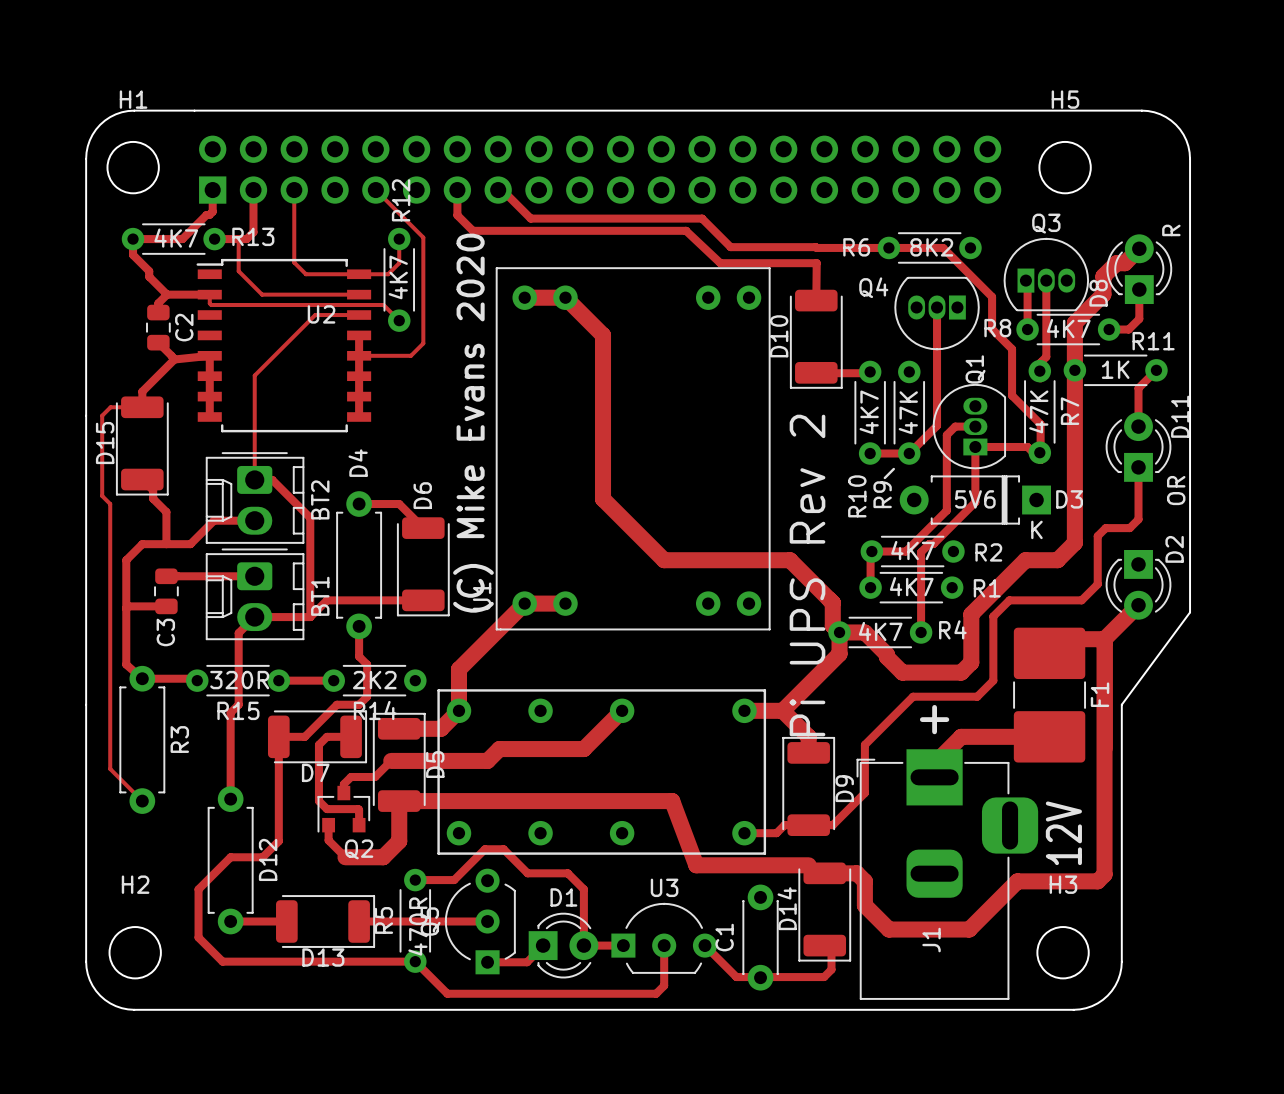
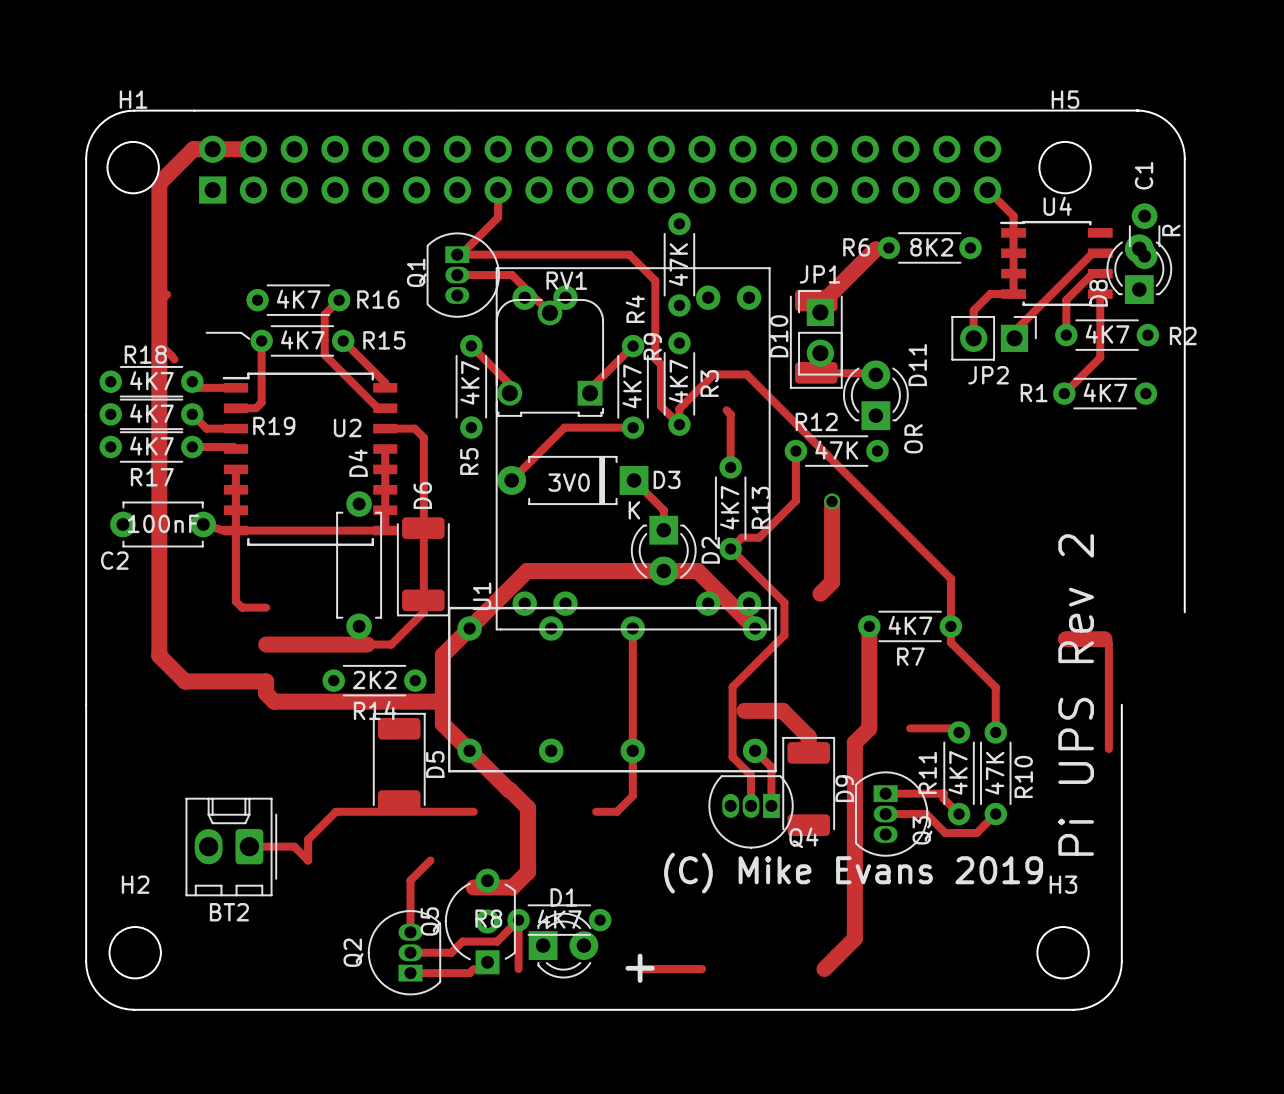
board edge: (194, 110) (1141, 110) (1154, 112) (1165, 117) (1175, 124) (1183, 134) (1188, 146) (1190, 158) (1190, 612) (1121, 704) -> (194, 110) (1138, 110)
board edge: none -> (1136, 110) (1155, 114) (1170, 124) (1181, 140) (1184, 158)
track: none -> (253, 149) (193, 149) (159, 183) (159, 655) (185, 681) (266, 681) (266, 693) (274, 701) (442, 701)
board edge: none -> (1184, 158) (1184, 612)
track: (498, 185) (530, 218) (702, 218) (730, 247) (943, 247) (992, 296) (992, 329) (1012, 349) (1012, 395) (1040, 424) (1040, 460) (1027, 446) (975, 446) (975, 502) (933, 543) (929, 543) (921, 552) (921, 632) -> none
track: (212, 190) (212, 211) (206, 215) (182, 239) (133, 239) (133, 254) (149, 271) (149, 276) (167, 294) (209, 294) (211, 305) (383, 305) (399, 320) -> none
track: (253, 190) (253, 232) (246, 239) (214, 239) -> none
track: (294, 190) (294, 262) (305, 274) (388, 274) (399, 263) (399, 239) -> none
track: (375, 190) (423, 237) (423, 343) (410, 355) (359, 355) -> none
track: (457, 190) (457, 215) (472, 230) (686, 230) (720, 263) (816, 263) (816, 300) -> none
track: none -> (498, 190) (498, 217) (460, 254)
track: none -> (987, 190) (1013, 216) (1013, 294) (990, 294) (973, 310) (973, 338)
R12 name position: R12 (401, 200) -> R12 (816, 421)
R13 name position: R13 (253, 236) -> R13 (760, 507)
R13 rotation: 0° (173, 239) -> 90° clockwise (730, 508)
R13 position: (173, 239) -> (730, 508)
track: (238, 239) (238, 271) (262, 294) (359, 294) -> none
track: (1139, 248) (1124, 263) (1116, 263) (1103, 276) (1103, 294) (1074, 323) (1074, 542) (1057, 560) (1025, 560) (971, 614) (971, 662) (961, 672) (902, 672) (864, 632) (839, 632) -> none
track: none -> (875, 249) (820, 304) (820, 312)
track: none -> (1100, 253) (1092, 253) (1014, 331) (1014, 338)
track: none -> (457, 254) (629, 254) (655, 280) (655, 358) (660, 364) (660, 406) (679, 424) (679, 408) (713, 374) (746, 374) (950, 578) (950, 642) (995, 687) (995, 732)
U4: none -> (1056, 263)
track: none -> (1100, 273) (1092, 273) (1066, 300) (1066, 335)
Q3 rotation: 0° (1046, 274) -> 90° clockwise (891, 814)
Q3 position: (1046, 274) -> (891, 814)
track: none -> (457, 275) (512, 275) (549, 312)
R12 value: 4K7 (398, 277) -> 47K (836, 450)
R12 rotation: 0° (399, 279) -> 90° clockwise (836, 451)
R12 position: (399, 279) -> (836, 451)
track: (1025, 280) (1027, 282) (1027, 329) -> none
track: (1046, 280) (1046, 356) (1040, 362) (1040, 378) -> none
Q4 name position: Q4 (873, 287) -> Q4 (803, 837)
track: (1139, 289) (1139, 318) (1128, 329) (1109, 329) -> none
track: none -> (1100, 294) (1100, 357) (1064, 393)
track: (524, 297) (565, 297) (603, 335) (603, 499) (664, 560) (790, 560) (832, 602) (832, 625) (839, 632) -> none
R16: none -> 4K7 (298, 300)
track: none -> (339, 300) (324, 314) (324, 354) (378, 408) (385, 408)
C2 footprint: [146, 304, 171, 351] -> [110, 501, 217, 548]
track: (937, 307) (937, 425) (909, 453) (870, 453) -> none
Q4 position: (937, 313) -> (751, 811)
track: (359, 315) (315, 315) (254, 375) (254, 479) (272, 479) (310, 517) (310, 617) -> none
C2 name position: C2 (184, 327) -> C2 (114, 560)
R8 position: (1068, 329) -> (559, 920)
line: none -> (206, 332) (241, 332) (249, 338)
JP1: none -> (820, 332)
track: (359, 335) (359, 416) -> none
JP2: none -> (994, 338)
track: none -> (261, 340) (261, 402) (255, 408) (235, 408)
track: none -> (343, 340) (385, 382) (385, 387)
R11 name position: R11 (1153, 341) -> R11 (927, 772)
U2 position: (283, 345) -> (309, 459)
track: none -> (471, 345) (511, 387)
track: none -> (633, 346) (591, 387)
RV1: none -> (549, 357)
Q1 name position: Q1 (975, 369) -> Q1 (416, 272)
R11 value: 1K (1115, 369) -> 4K7 (958, 772)
R11 rotation: 0° (1115, 370) -> 90° clockwise (959, 773)
R11 position: (1115, 370) -> (959, 773)
track: (1156, 370) (1138, 388) (1138, 426) -> none
R18: none -> 4K7 (151, 381)
track: none -> (192, 381) (198, 387) (235, 387)
R3 value: none -> 4K7 (678, 381)
track: none -> (726, 410) (730, 414) (730, 467)
R7 value: 47K (1038, 411) -> 4K7 (910, 625)
R7 rotation: 0° (1039, 411) -> 90° clockwise (910, 626)
R7 position: (1039, 411) -> (910, 626)
R10 value: 4K7 (869, 412) -> 47K (994, 773)
R10 position: (870, 412) -> (995, 773)
R9 position: (909, 412) -> (679, 264)
R19: none -> 4K7 (151, 414)
track: none -> (192, 414) (206, 428) (235, 428)
track: (209, 416) (209, 355) (174, 359) (142, 391) (142, 407) (110, 407) (102, 415) (102, 495) (110, 504) (110, 768) (142, 801) -> none
text: (C) Mike Evans 2020 (473, 423) -> none
Q1 rotation: 0° (969, 426) -> 180° (463, 275)
Q1 position: (969, 426) -> (463, 275)
track: (975, 426) (955, 426) (946, 435) (946, 510) (905, 551) (870, 552) (870, 587) -> none
track: none -> (633, 427) (564, 427) (511, 480)
track: none -> (385, 428) (414, 428) (423, 437) (423, 612) (391, 644) (266, 644)
D15: (142, 445) -> none
R17: none -> 4K7 (151, 446)
track: none -> (192, 446) (233, 446) (235, 449)
D11 position: (1138, 446) -> (875, 395)
track: none -> (385, 449) (385, 530) (223, 530) (203, 524)
track: none -> (795, 451) (795, 500) (759, 537) (741, 537) (730, 548) (784, 602) (784, 635) (732, 687) (732, 757) (751, 775) (751, 805)
BT2 footprint: [205, 452, 305, 544] -> [185, 797, 278, 897]
track: (1138, 467) (1138, 519) (1129, 528) (1105, 528) (1097, 536) (1097, 584) (1081, 600) (1009, 600) (993, 616) (993, 680) (977, 696) (913, 696) (864, 744) (864, 793) (832, 825) (784, 825) (776, 833) (744, 833) -> none
track: none -> (235, 469) (235, 601) (242, 607) (266, 607)
line: (893, 469) (884, 477) -> none
track: (142, 479) (153, 490) (153, 498) (166, 512) (166, 544) -> none
track: none -> (634, 480) (663, 510) (663, 530)
R10 name position: R10 (857, 496) -> R10 (1023, 776)
BT2 name position: BT2 (320, 499) -> BT2 (229, 912)
D3 value: 5V6 (975, 499) -> 3V0 (569, 482)
D3 position: (975, 500) -> (572, 480)
track: none -> (832, 501) (832, 582) (820, 593)
via: none -> (832, 501)
track: (359, 504) (399, 504) (423, 528) -> none
track: (254, 520) (213, 520) (190, 544) (142, 544) (126, 560) (126, 664) (142, 678) (195, 678) (197, 680) -> none
C2 value: none -> 100nF (163, 523)
D2 name position: D2 (1174, 549) -> D2 (710, 550)
R2 position: (912, 551) -> (1107, 335)
text position: Pi UPS Rev 2 (807, 575) -> Pi UPS Rev 2 (1076, 695)
track: (166, 576) (254, 576) -> none
D2 position: (1138, 584) -> (663, 550)
R1 position: (911, 587) -> (1105, 393)
R1 name position: R1 (987, 588) -> R1 (1034, 393)
C3: (166, 591) -> none
BT1: (255, 594) -> none
track: (423, 600) (326, 600) (310, 617) -> none
track: (565, 603) (524, 603) (458, 669) (458, 710) (440, 728) (399, 728) -> none
track: (1138, 605) (1104, 639) (1104, 874) (1097, 881) (1017, 881) (969, 929) (888, 929) (864, 905) (864, 881) (856, 873) (824, 873) -> none
track: (166, 606) (128, 606) (126, 608) -> none
track: (310, 617) (254, 617) (238, 633) (238, 704) (230, 712) (230, 799) -> none
track: (359, 626) (359, 656) (367, 664) (367, 696) (359, 704) (336, 704) (304, 736) (278, 736) (278, 841) (262, 857) (230, 857) (198, 889) (198, 937) (222, 961) (415, 961) (447, 993) (656, 993) (664, 985) (664, 945) -> none
track: none -> (869, 626) (869, 728) (854, 742) (854, 938) (824, 969)
track: none -> (632, 628) (632, 796) (617, 811) (596, 811)
track: none -> (755, 628) (697, 571) (527, 571) (442, 655) (442, 724) (527, 807) (527, 872) (512, 887) (473, 887)
R4 name position: R4 (952, 629) -> R4 (635, 309)
track: (839, 632) (839, 653) (782, 710) -> none
R4 rotation: 0° (880, 632) -> 90° clockwise (633, 386)
R4 position: (880, 632) -> (633, 386)
R3 footprint: [119, 665, 166, 814] -> [663, 331, 696, 436]
R15 position: (238, 680) -> (302, 340)
R15 value: 320R (239, 680) -> 4K7 (302, 339)
track: (278, 680) (333, 680) -> none
F1: (1049, 695) -> none
R15 name position: R15 (238, 710) -> R15 (384, 340)
track: (622, 710) (583, 749) (499, 749) (487, 760) (391, 760) (375, 776) (351, 776) (343, 784) (343, 793) -> none
text position: + (934, 719) -> + (640, 968)
track: none -> (910, 728) (954, 728) (959, 732)
D7: (317, 736) -> none
track: (351, 736) (326, 736) (318, 744) (318, 801) (326, 809) (358, 809) (359, 825) -> none
track: (1049, 736) (961, 736) (934, 763) (934, 777) -> none
track: none -> (755, 750) (771, 767) (771, 805)
part position: (601, 772) -> (612, 689)
Q2 footprint: [317, 785, 371, 833] -> [367, 910, 442, 996]
track: none -> (885, 793) (943, 793) (943, 798) (959, 814)
track: none -> (473, 811) (336, 811) (308, 839) (308, 860) (294, 846) (249, 846)
track: none -> (885, 814) (926, 814) (945, 832) (976, 832) (995, 814)
track: (328, 825) (328, 840) (345, 857) (383, 857) (399, 841) (399, 801) (672, 801) (696, 865) (808, 865) -> none
text: 12V (1063, 833) -> none
Q2 name position: Q2 (359, 849) -> Q2 (353, 952)
D12: (230, 860) -> none
track: none -> (430, 860) (410, 880) (410, 932)
text: none -> (C) Mike Evans 2019 (853, 873)
J1: (947, 874) -> none
track: (415, 880) (454, 880) (484, 849) (503, 849) (527, 873) (567, 873) (583, 889) (583, 945) (623, 945) -> none
C1 footprint: [742, 884, 779, 991] -> [1128, 203, 1161, 270]
D14: (824, 912) -> none
R5 name position: R5 (383, 920) -> R5 (469, 461)
R5 position: (415, 920) -> (471, 386)
track: (230, 921) (286, 921) -> none
D13: (325, 921) -> none
track: (359, 921) (487, 921) -> none
R5 value: 470R (417, 926) -> 4K7 (469, 382)
C1 name position: C1 (724, 937) -> C1 (1144, 175)
U3: (664, 938) -> none
track: (543, 945) (527, 962) (487, 962) -> none
track: (704, 945) (736, 977) (824, 977) (831, 969) (831, 952) (824, 945) -> none
track: none -> (410, 952) (451, 952) (462, 941) (497, 941) (518, 920) (518, 969)
track: none -> (473, 969) (469, 973) (410, 973)
track: none -> (640, 969) (702, 969)

